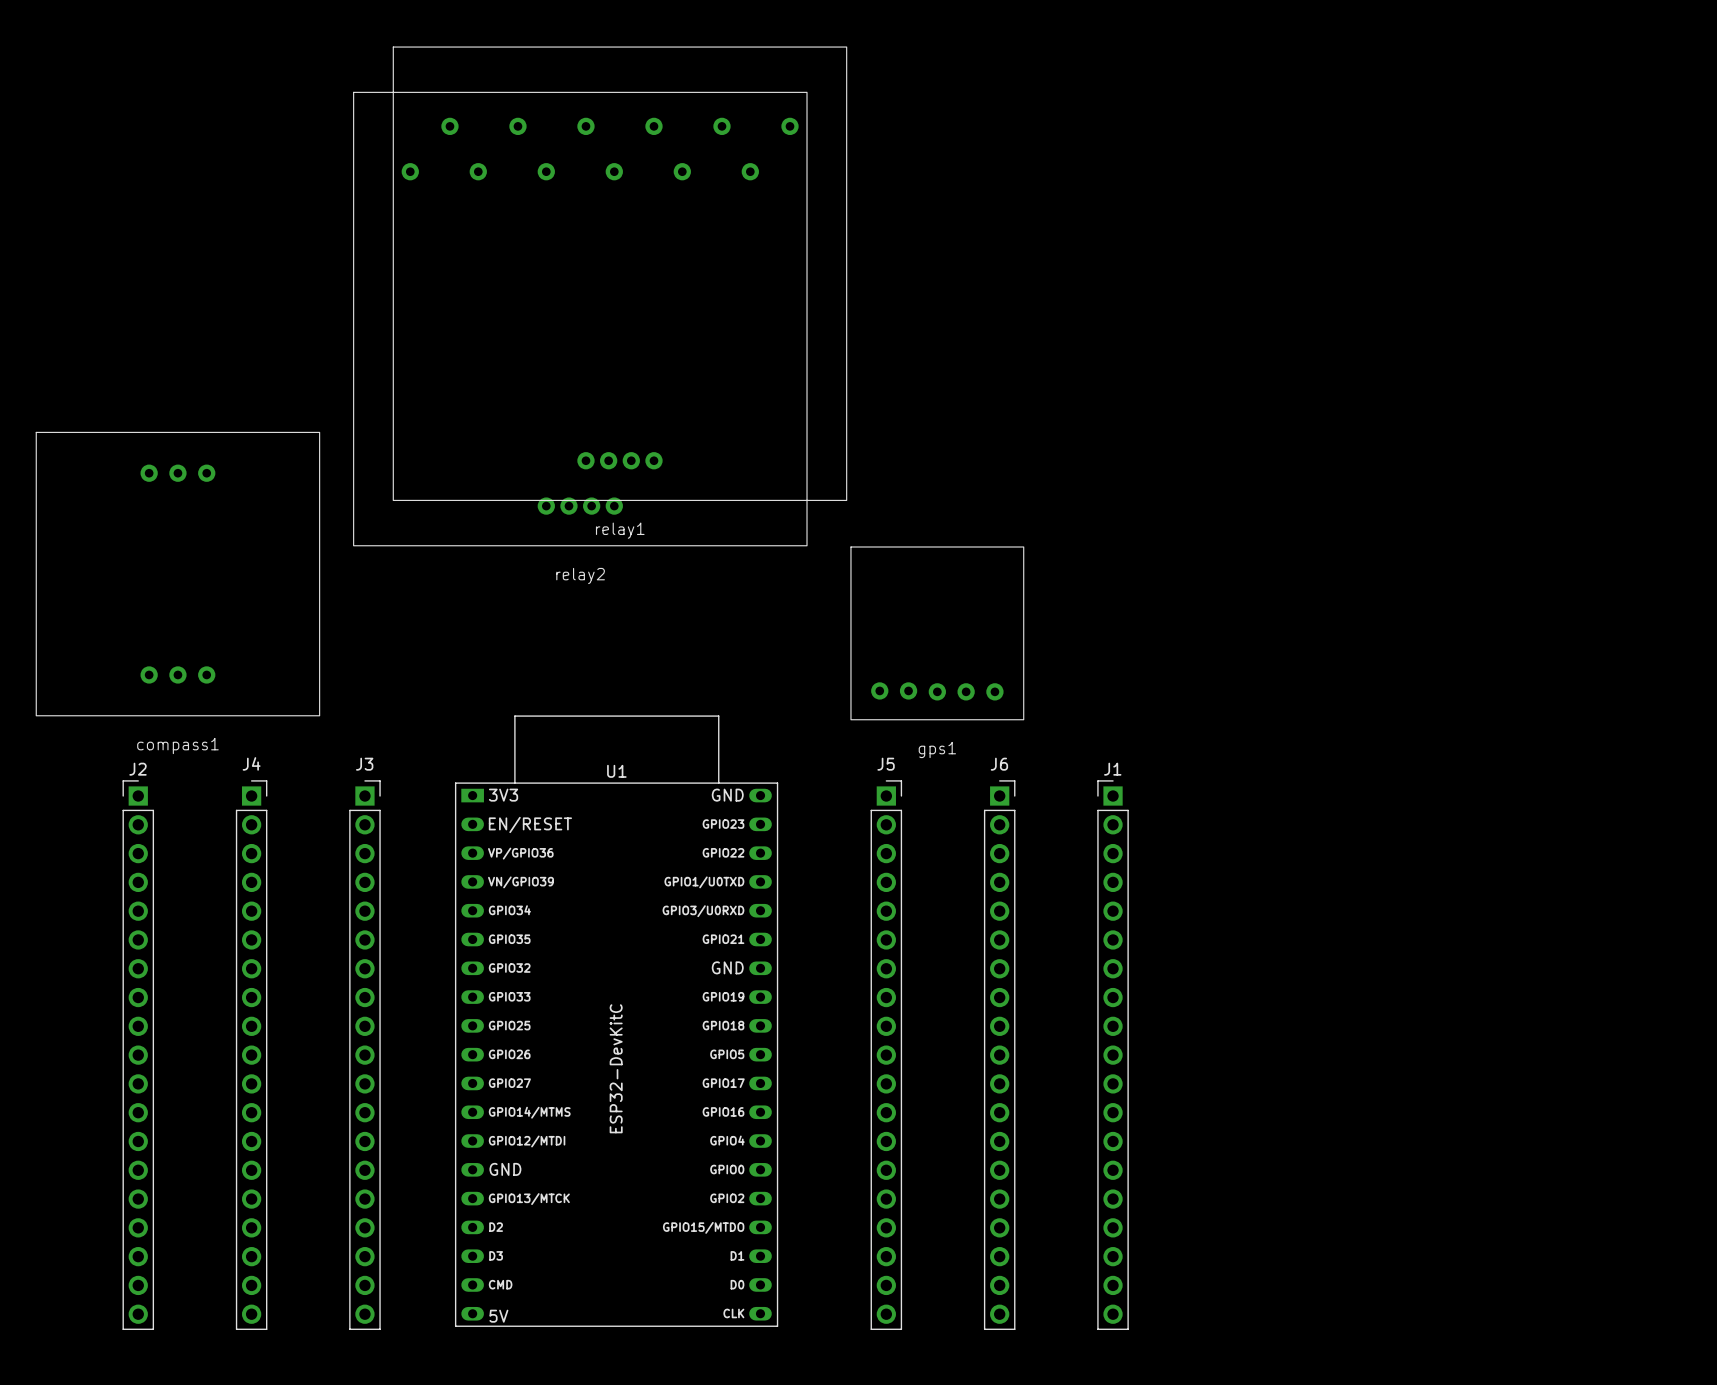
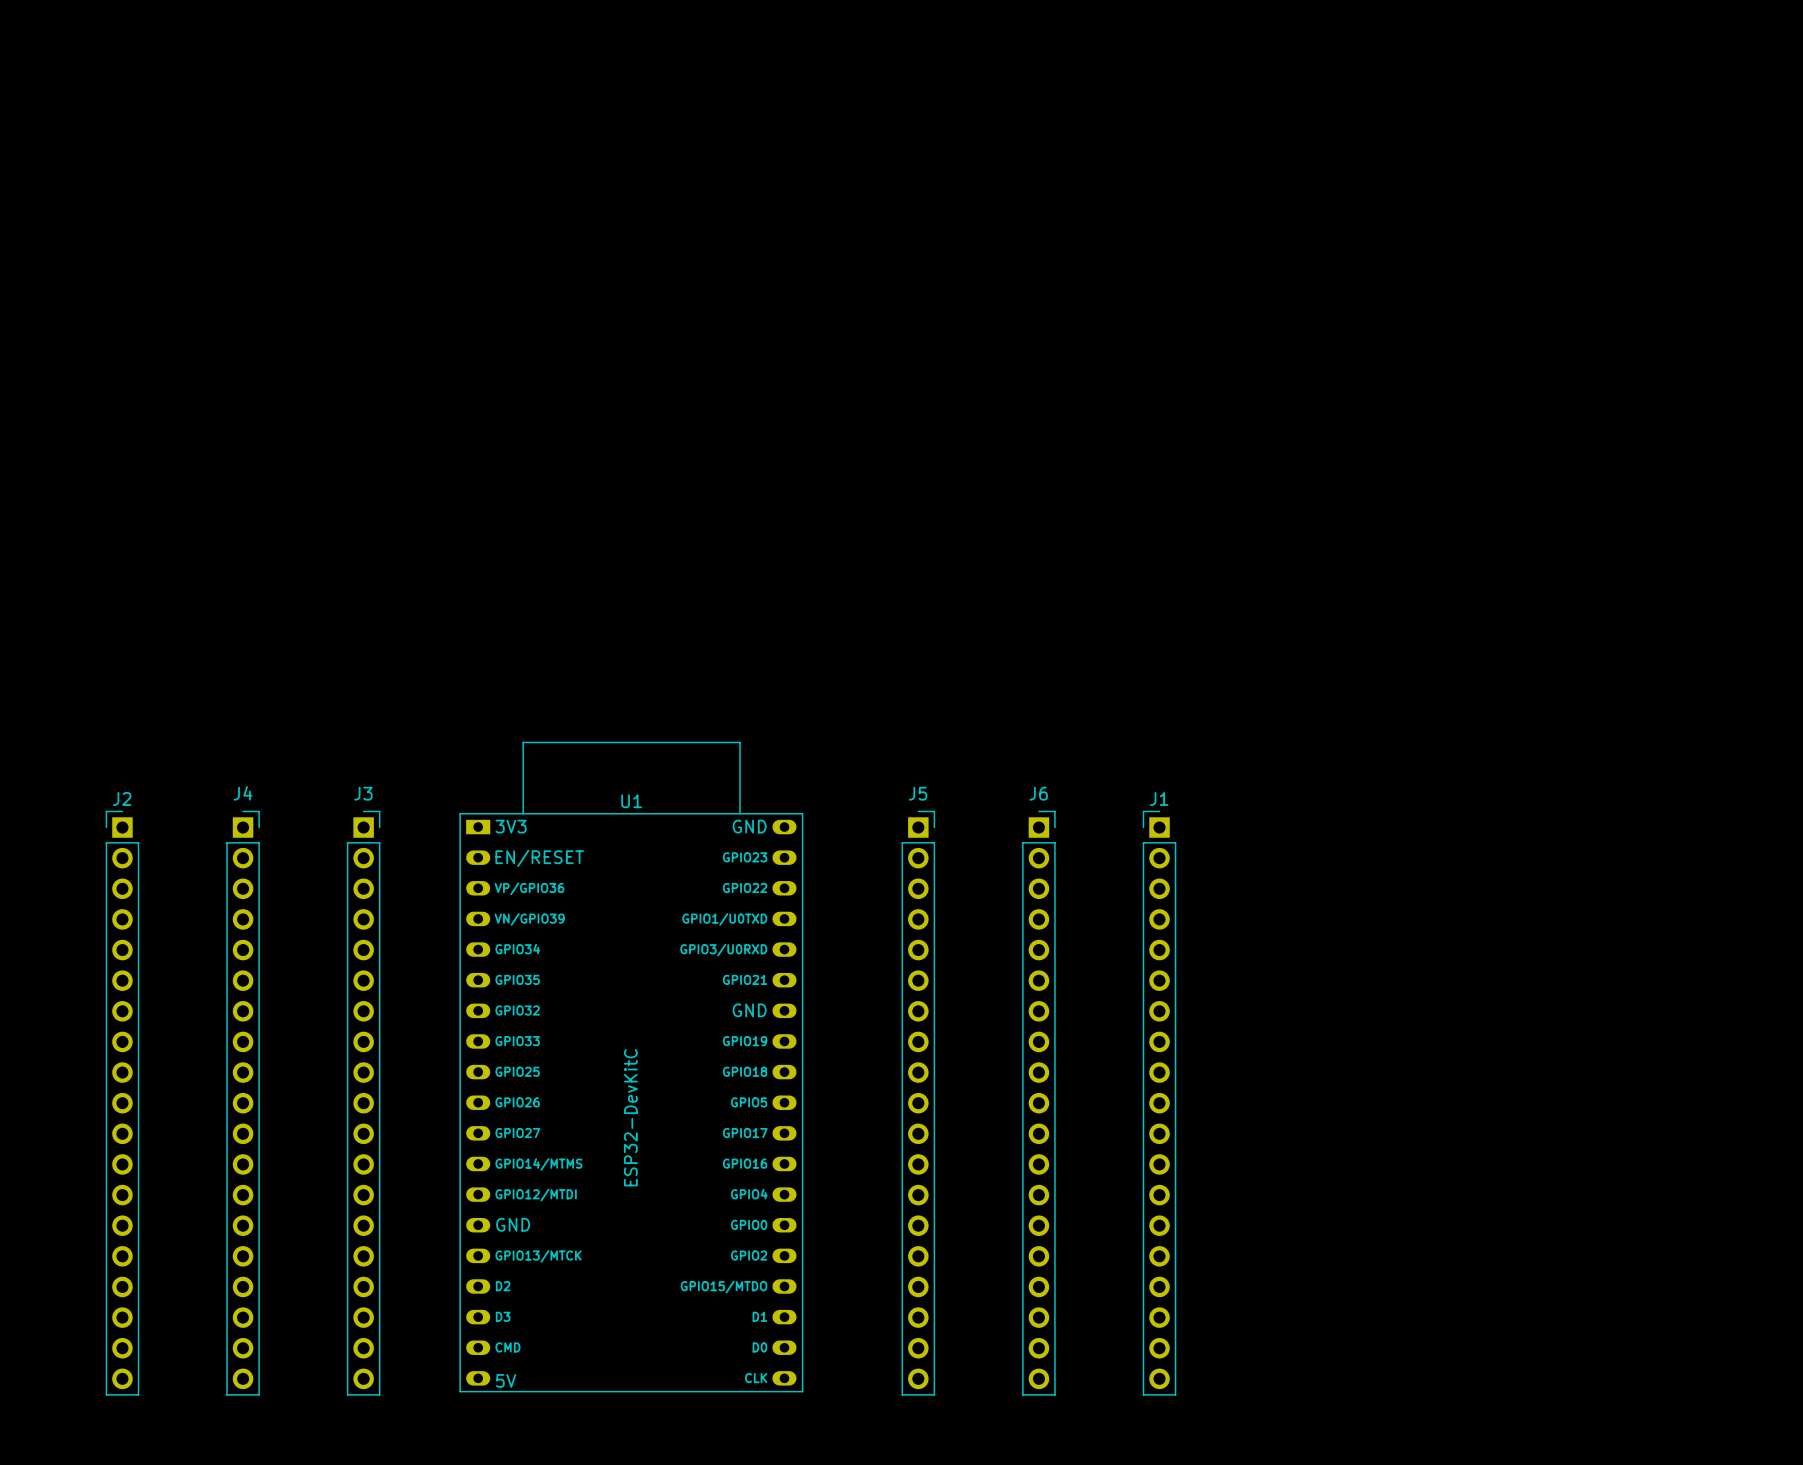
relay1: (619, 273) -> none
relay2: (580, 319) -> none
compass1: (177, 574) -> none
gps1: (937, 633) -> none

